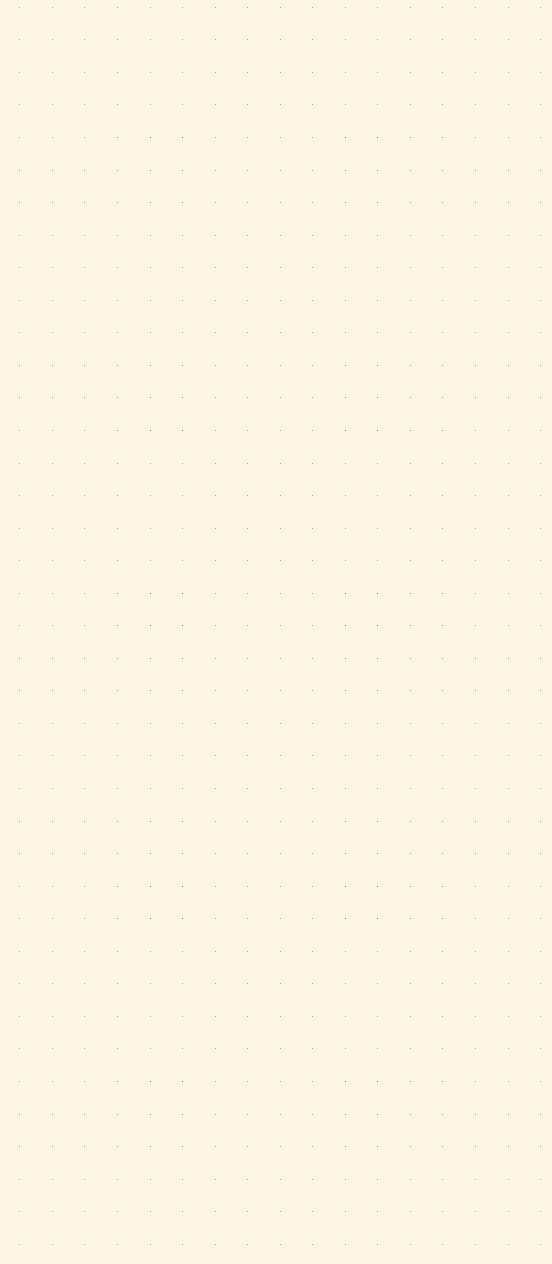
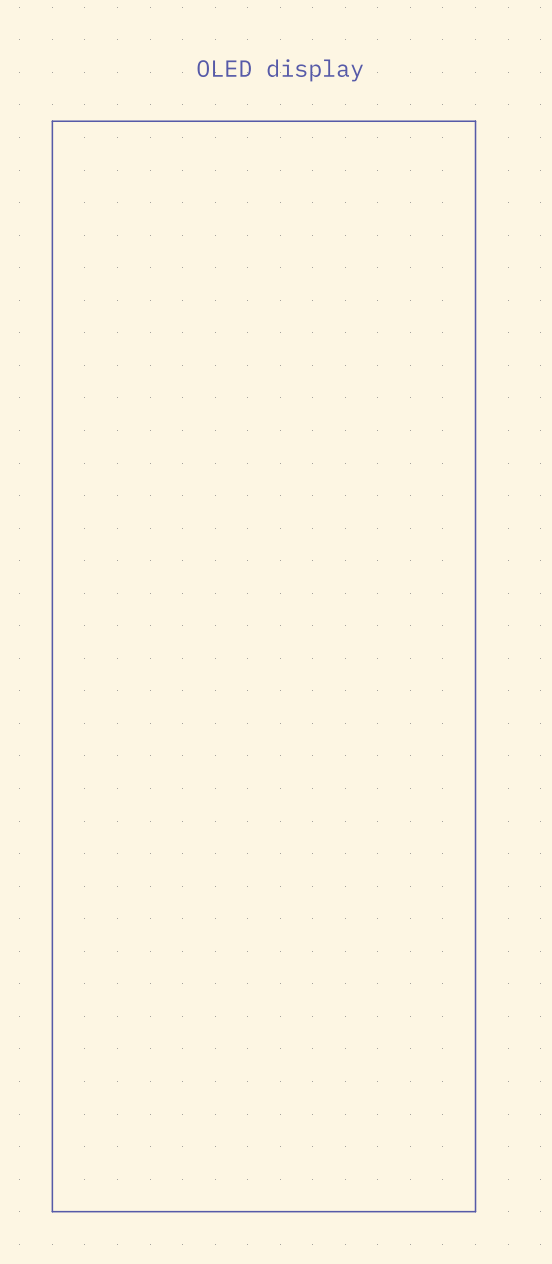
text: none -> OLED display (280, 70)
line: none -> (52, 121) (475, 121) (475, 1211) (52, 1211) (52, 121)

